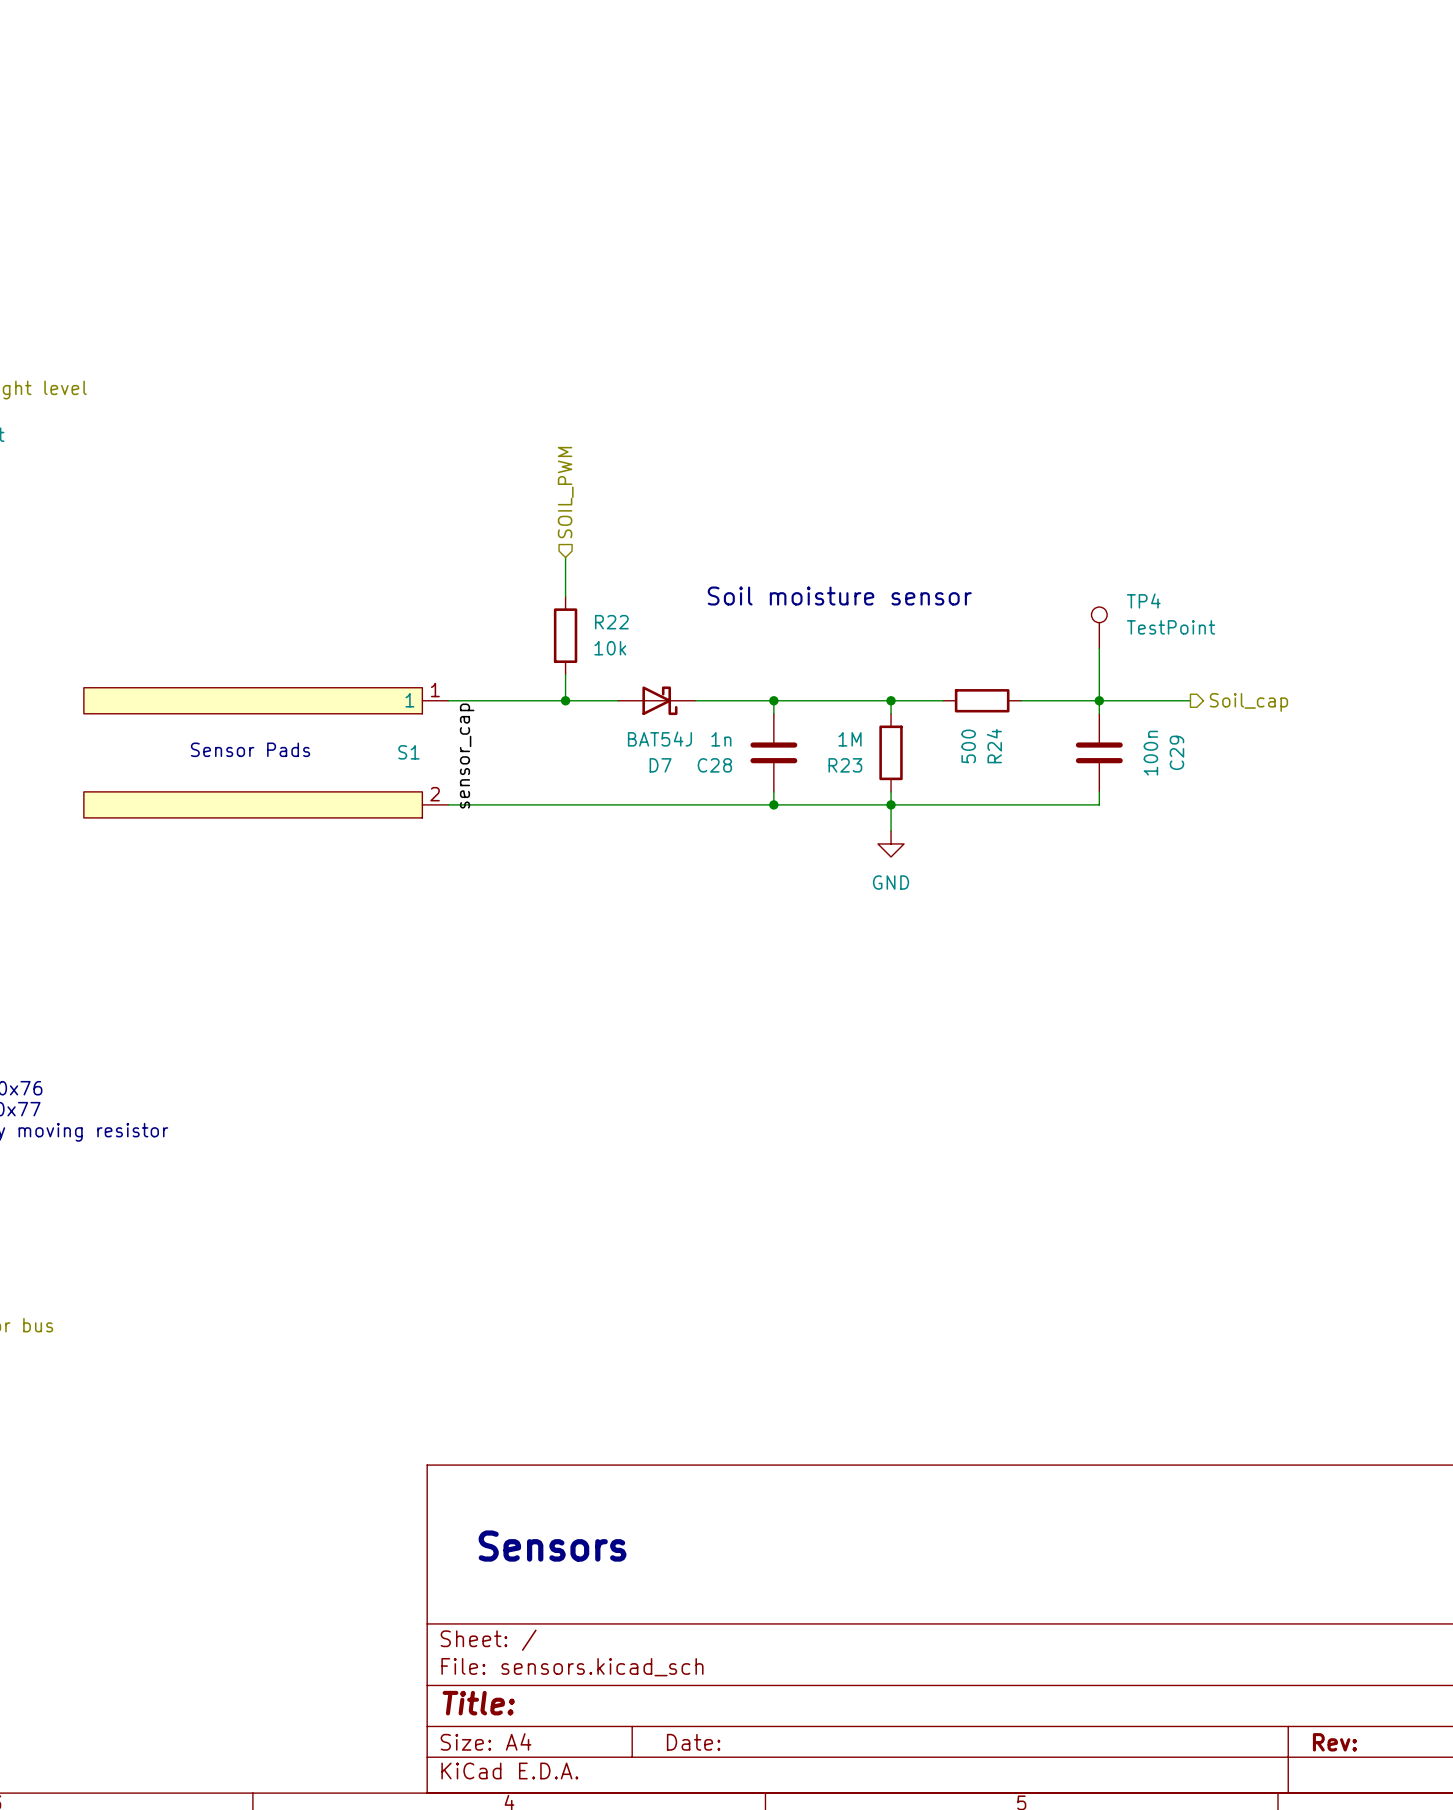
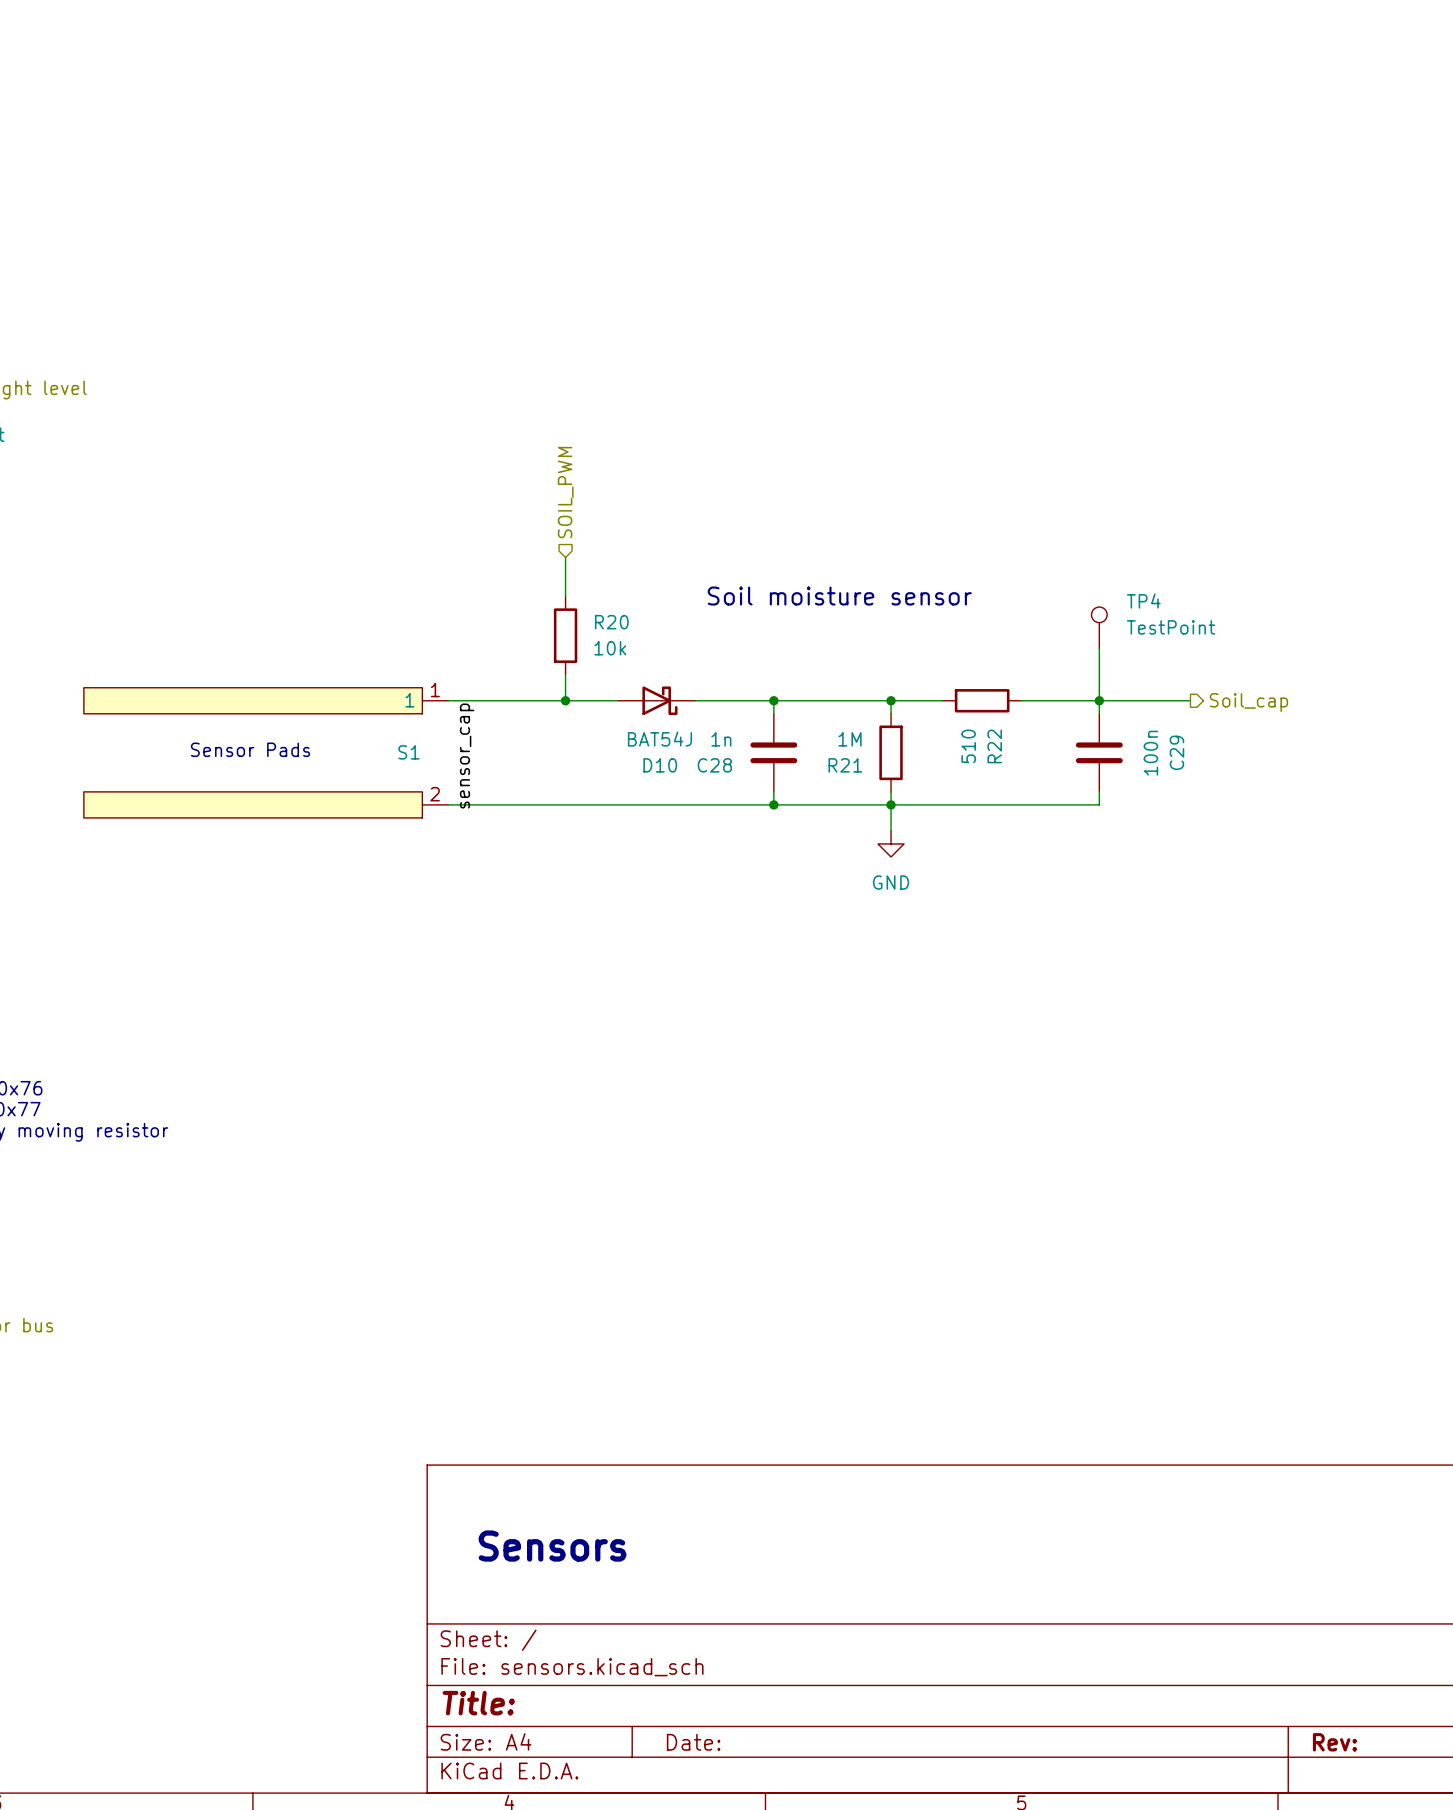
R22 name: R22 (611, 622) -> R20 (611, 622)
R24 value: 500 (968, 746) -> 510 (968, 746)
R24 name: R24 (994, 746) -> R22 (994, 746)
D7 name: D7 (660, 765) -> D10 (660, 765)
R23 name: R23 (845, 765) -> R21 (845, 765)

